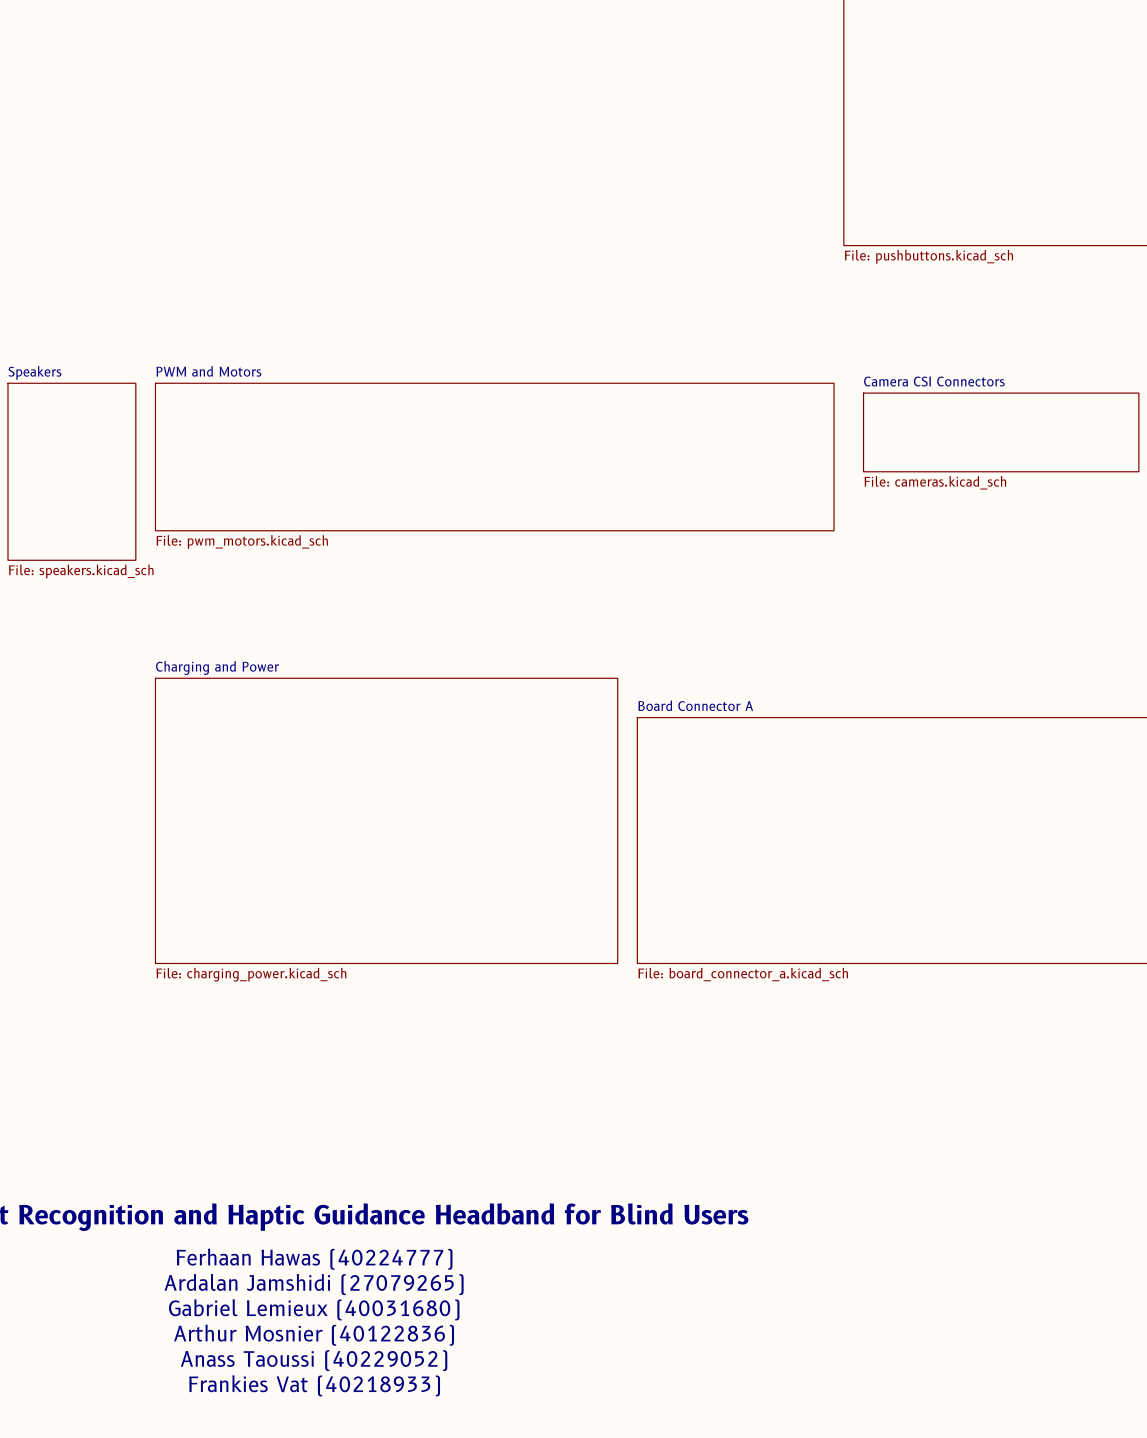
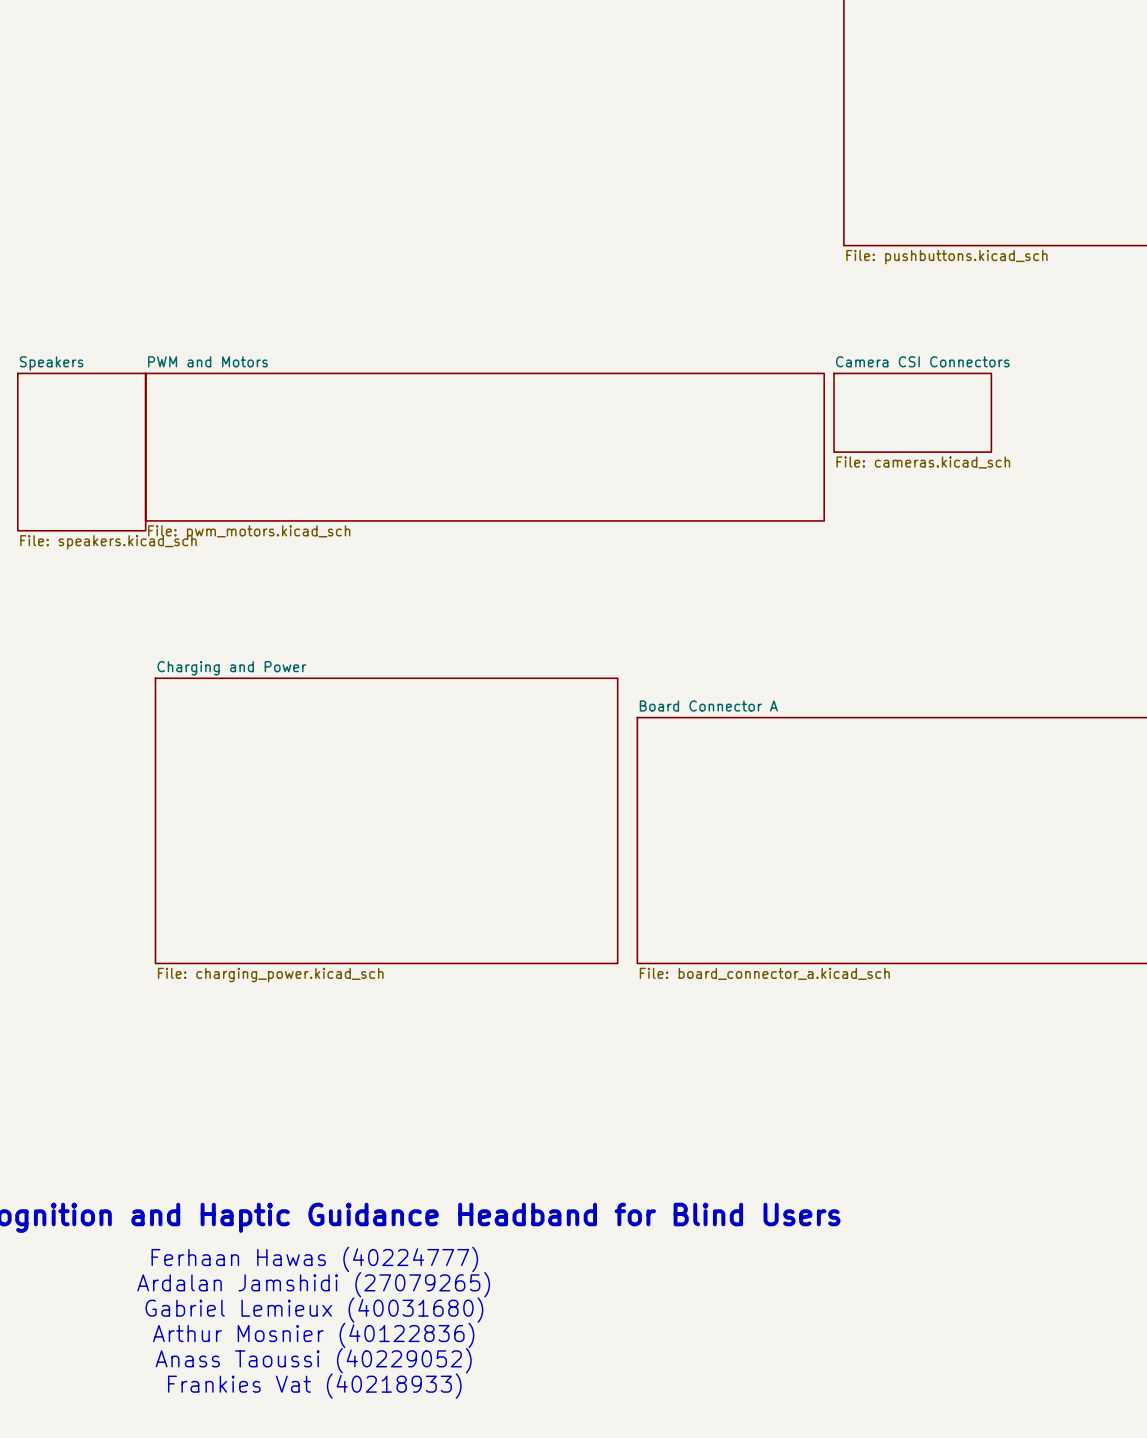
sheet Camera CSI Connectors: none -> File: cameras.kicad_sch (912, 412)
sheet Camera CSI Connectors: File: cameras.kicad_sch (1001, 432) -> none
sheet Speakers: none -> File: speakers.kicad_sch (81, 452)
sheet PWM and Motors position: (494, 457) -> (484, 447)
sheet Speakers: File: speakers.kicad_sch (71, 471) -> none

